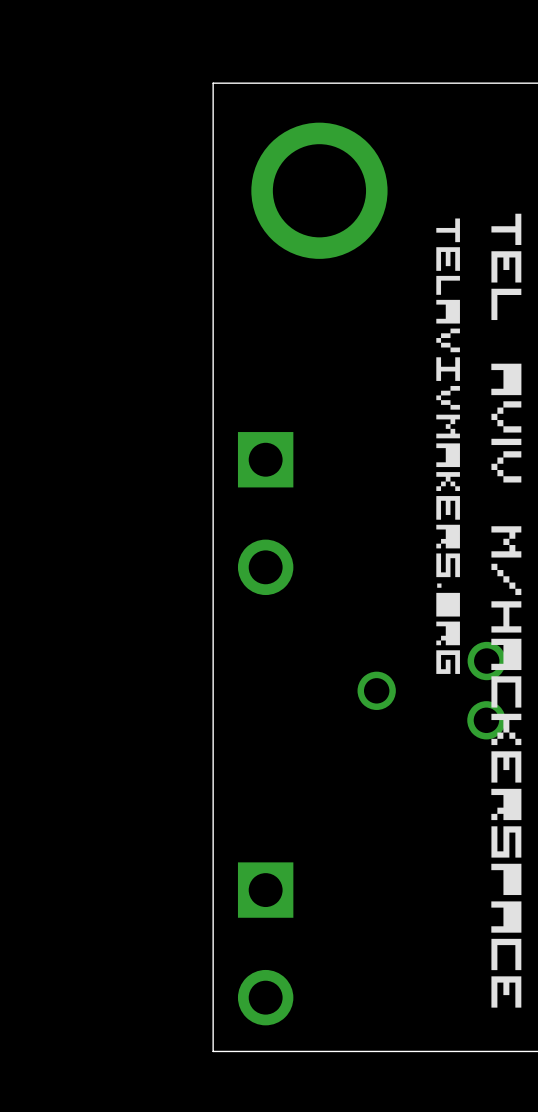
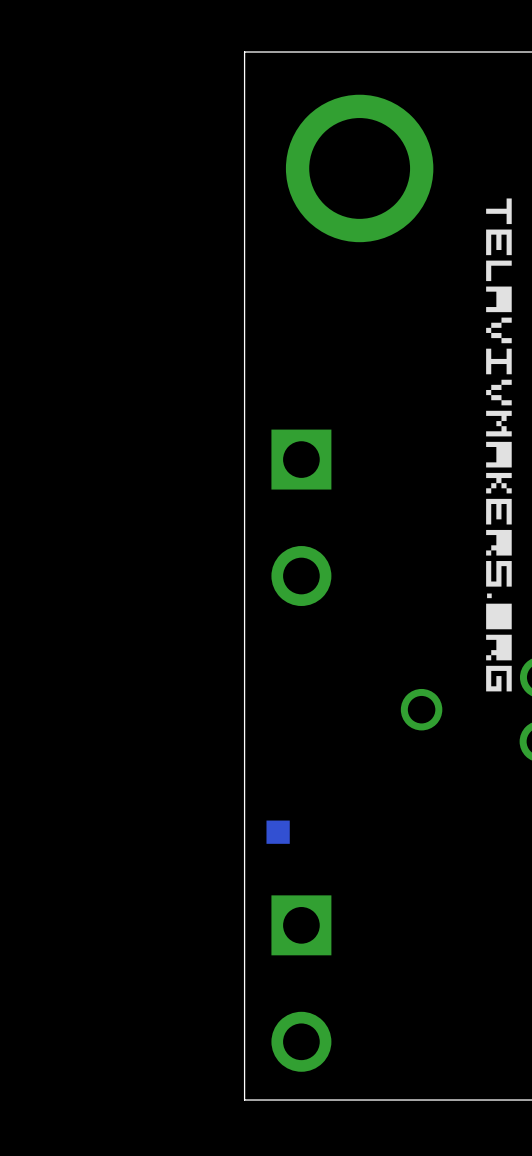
drawing: none -> [266, 820, 290, 844]

